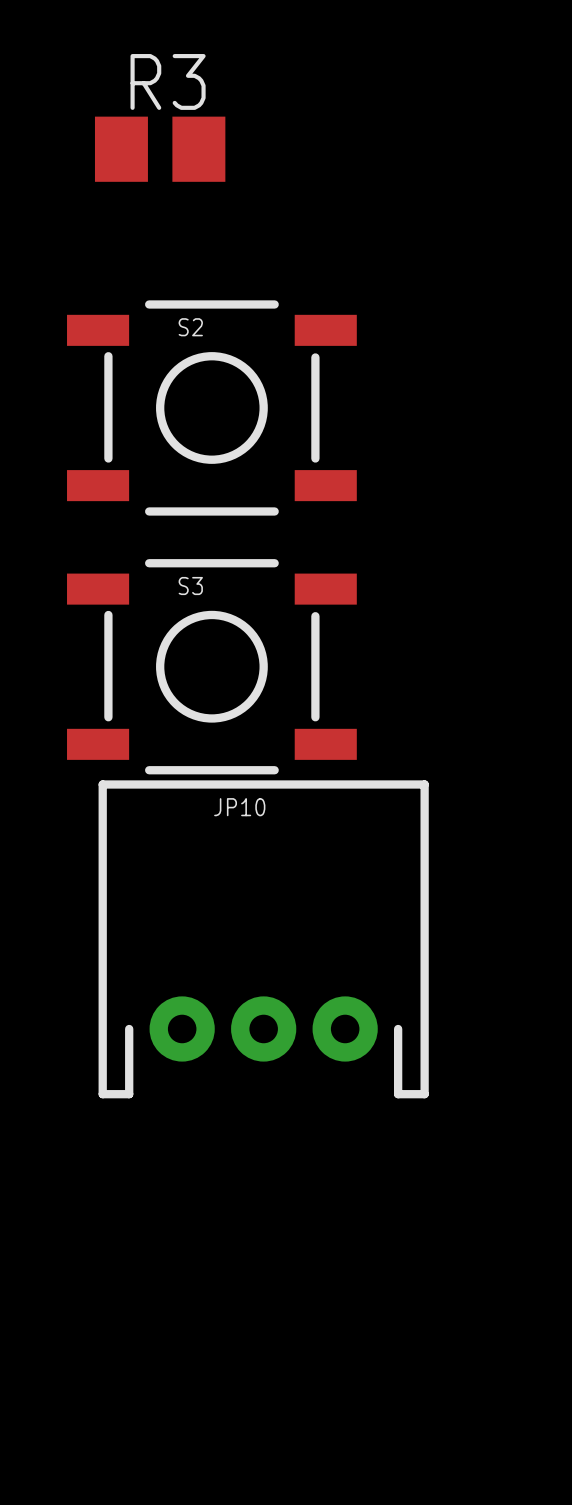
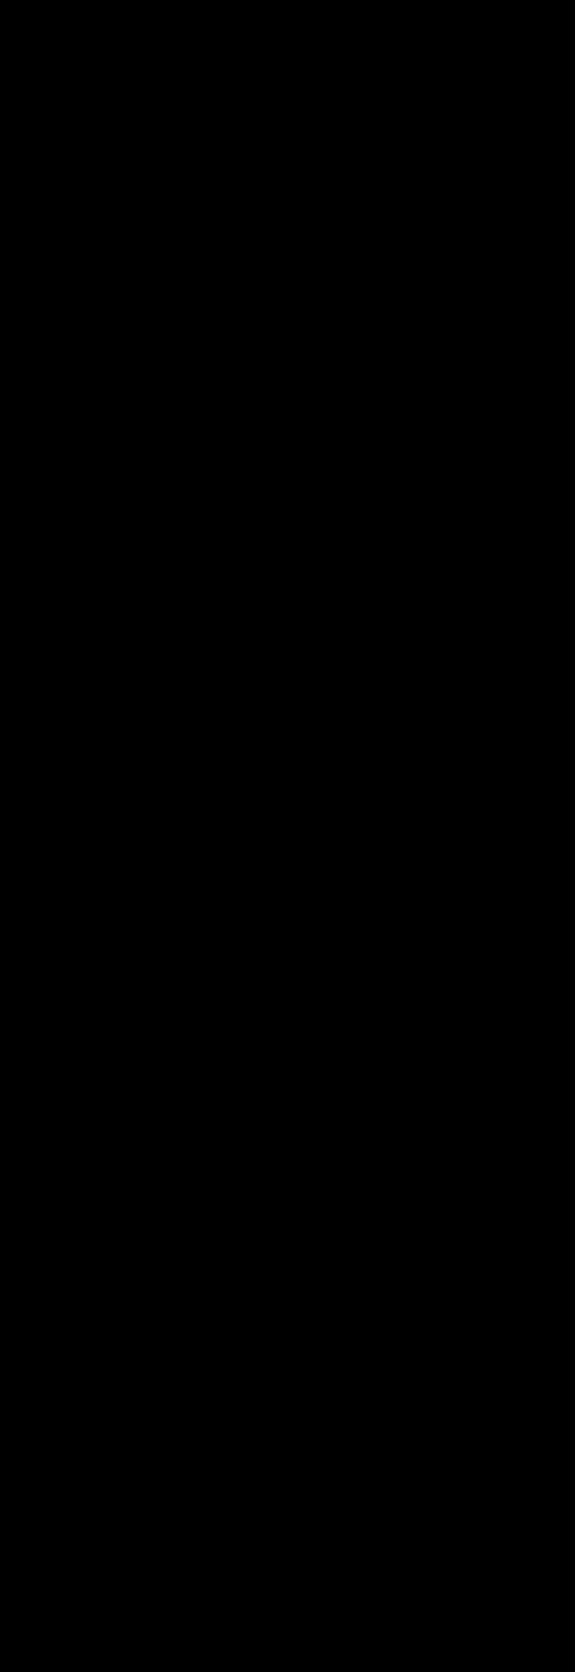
R3: (160, 149) -> none
S2: (211, 407) -> none
S3: (211, 666) -> none
JP10: (263, 939) -> none

